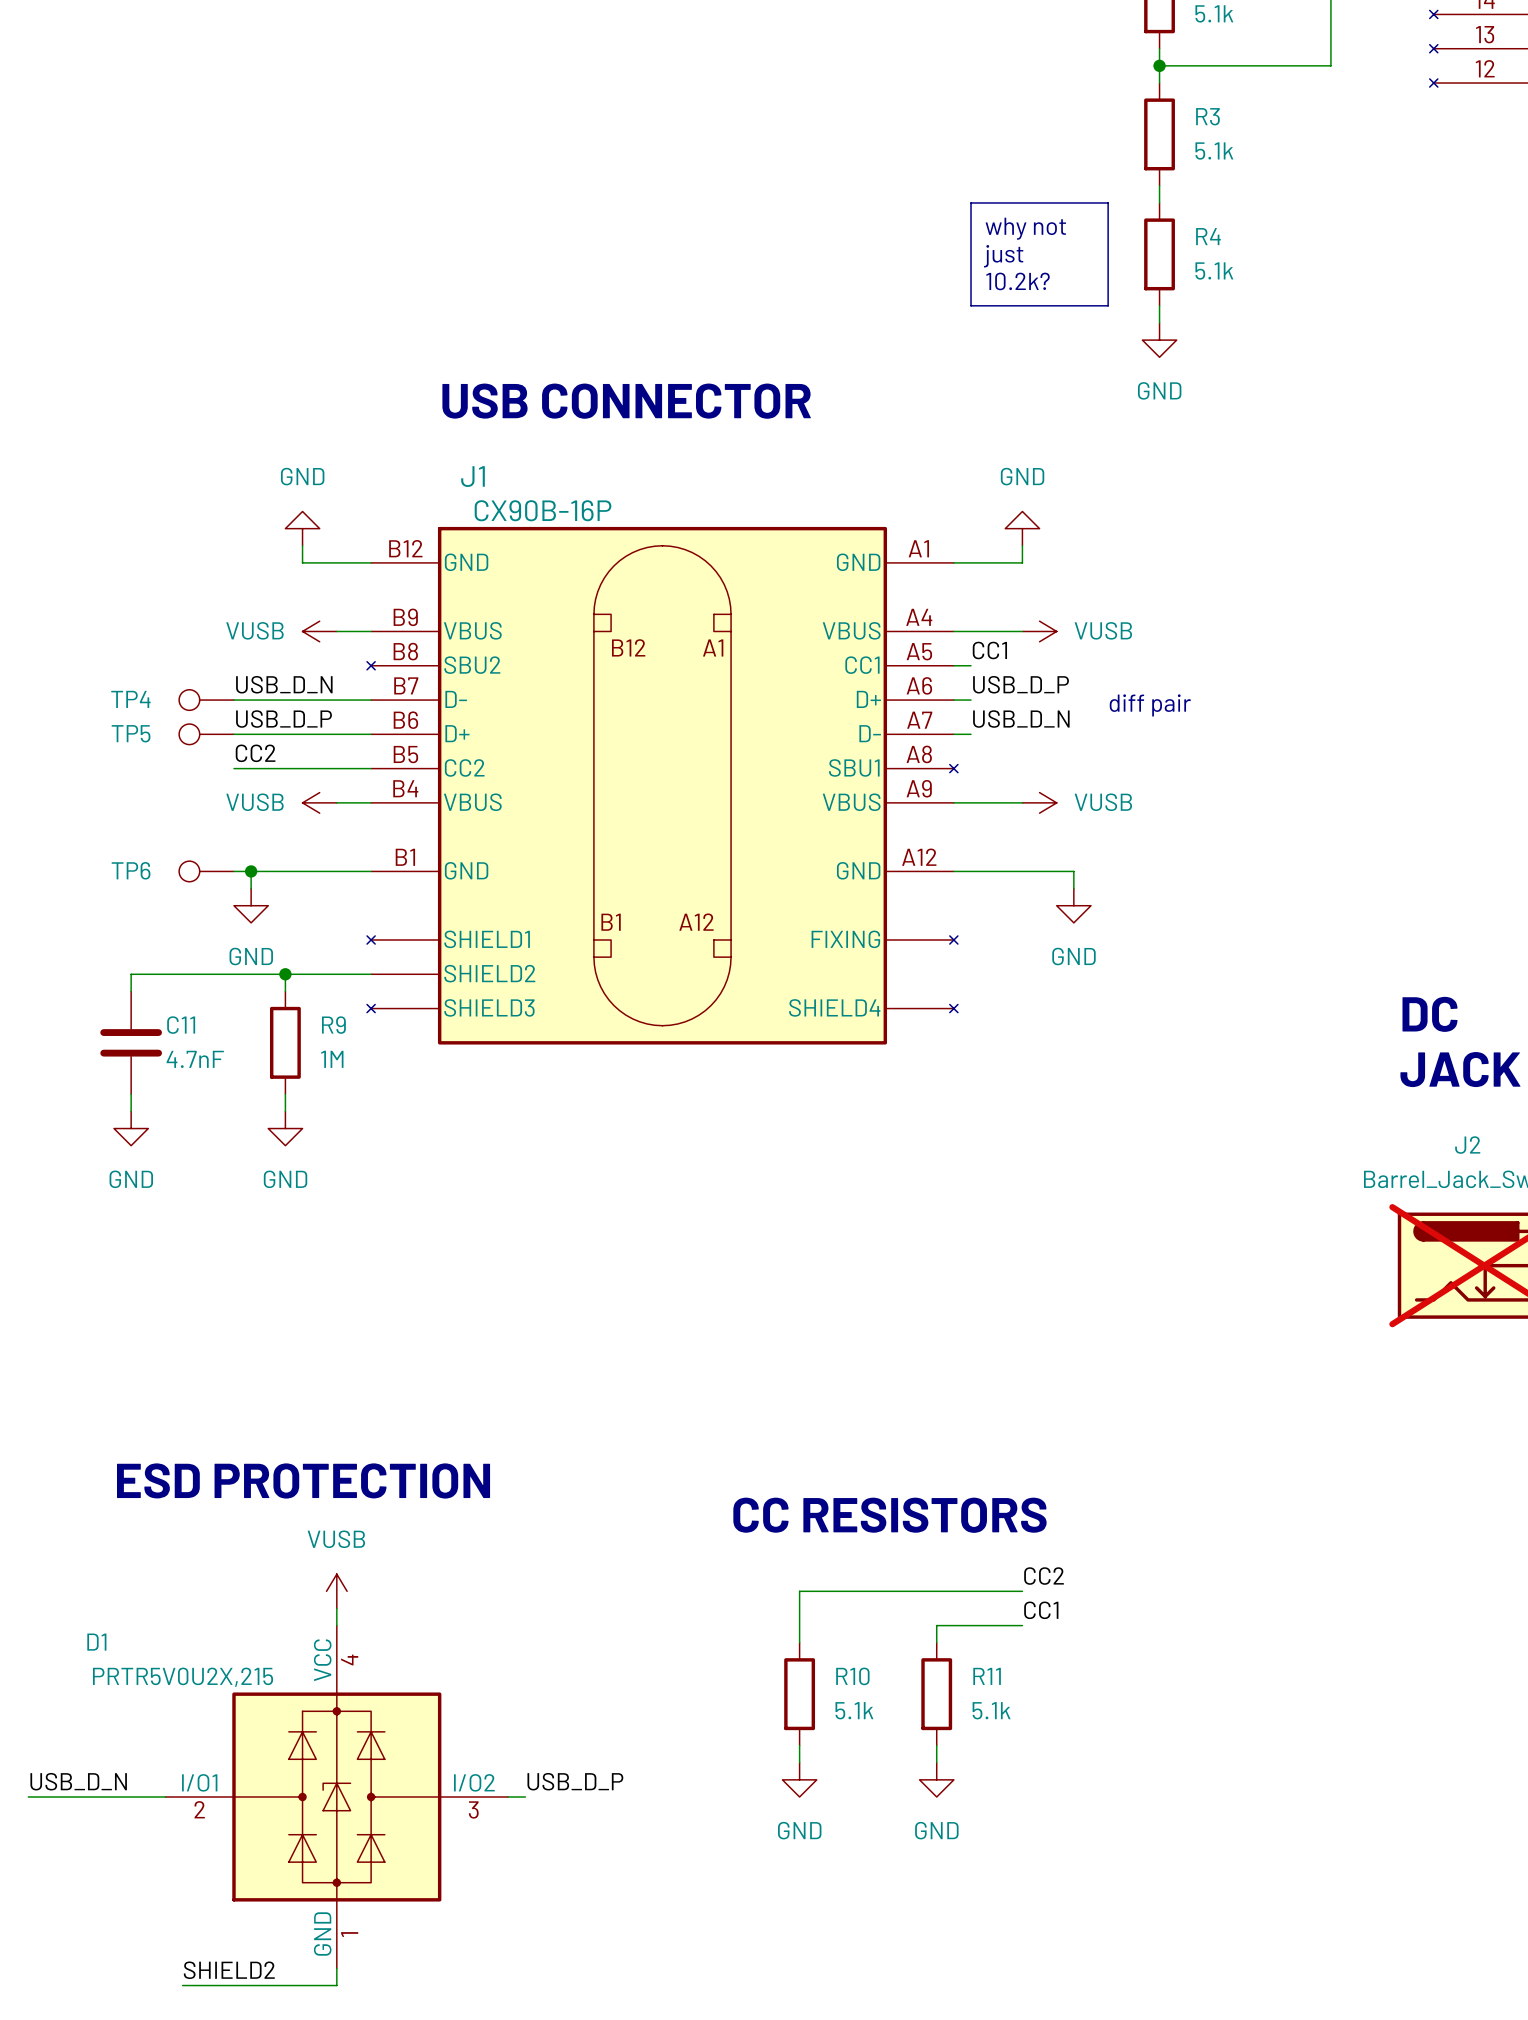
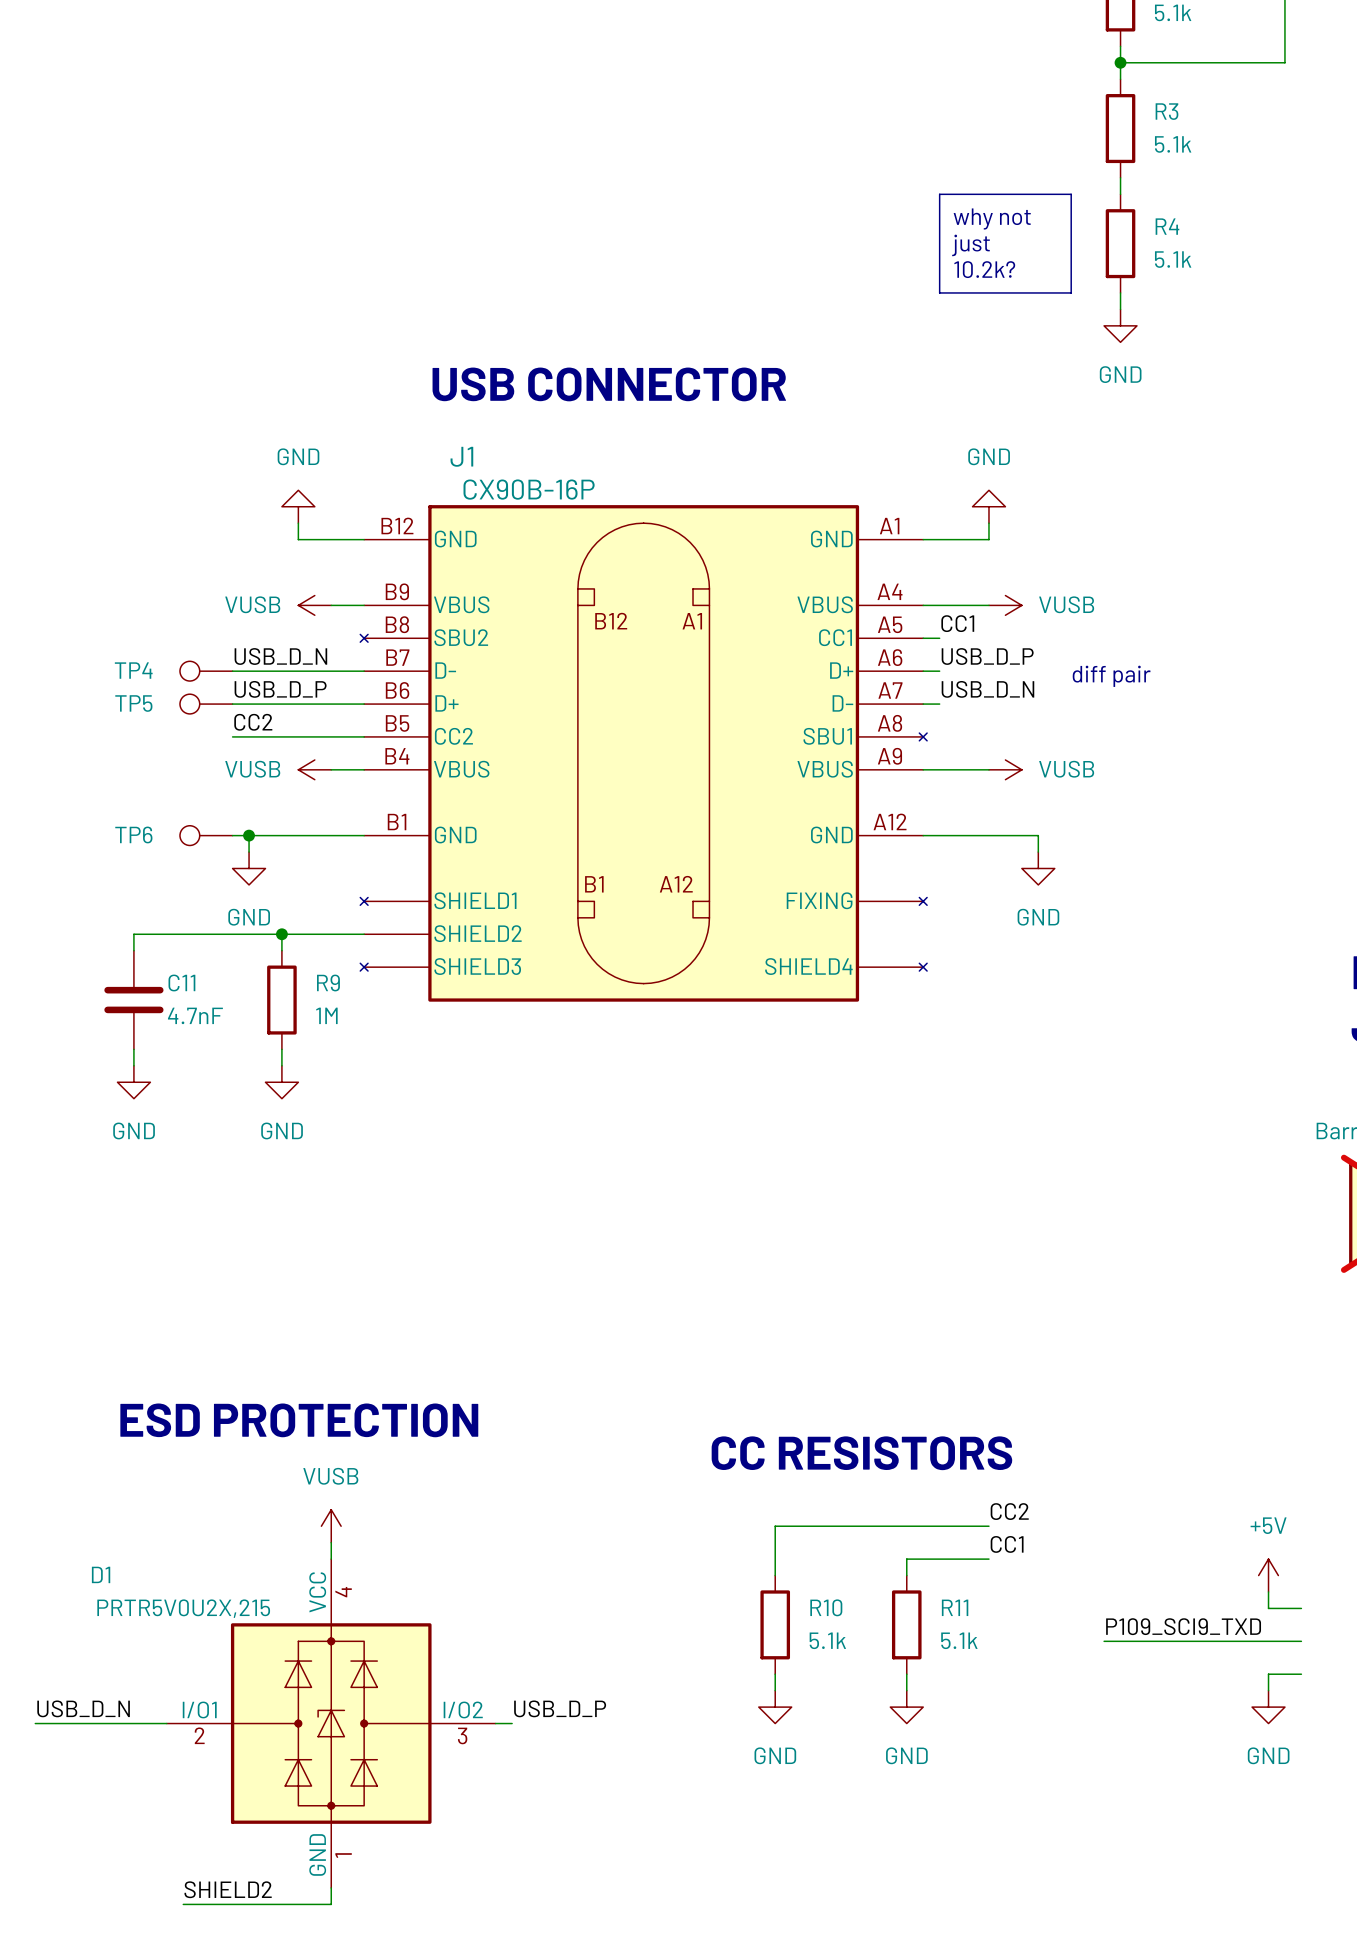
power symbol: none -> +5V (1268, 1575)
wire: none -> (1268, 1591) (1268, 1608) (1301, 1608)
label: none -> P109_SCI9_TXD (1183, 1626)
wire: none -> (1104, 1641) (1301, 1641)
wire: none -> (1301, 1674) (1268, 1674) (1268, 1690)
power symbol: none -> GND (1268, 1707)

